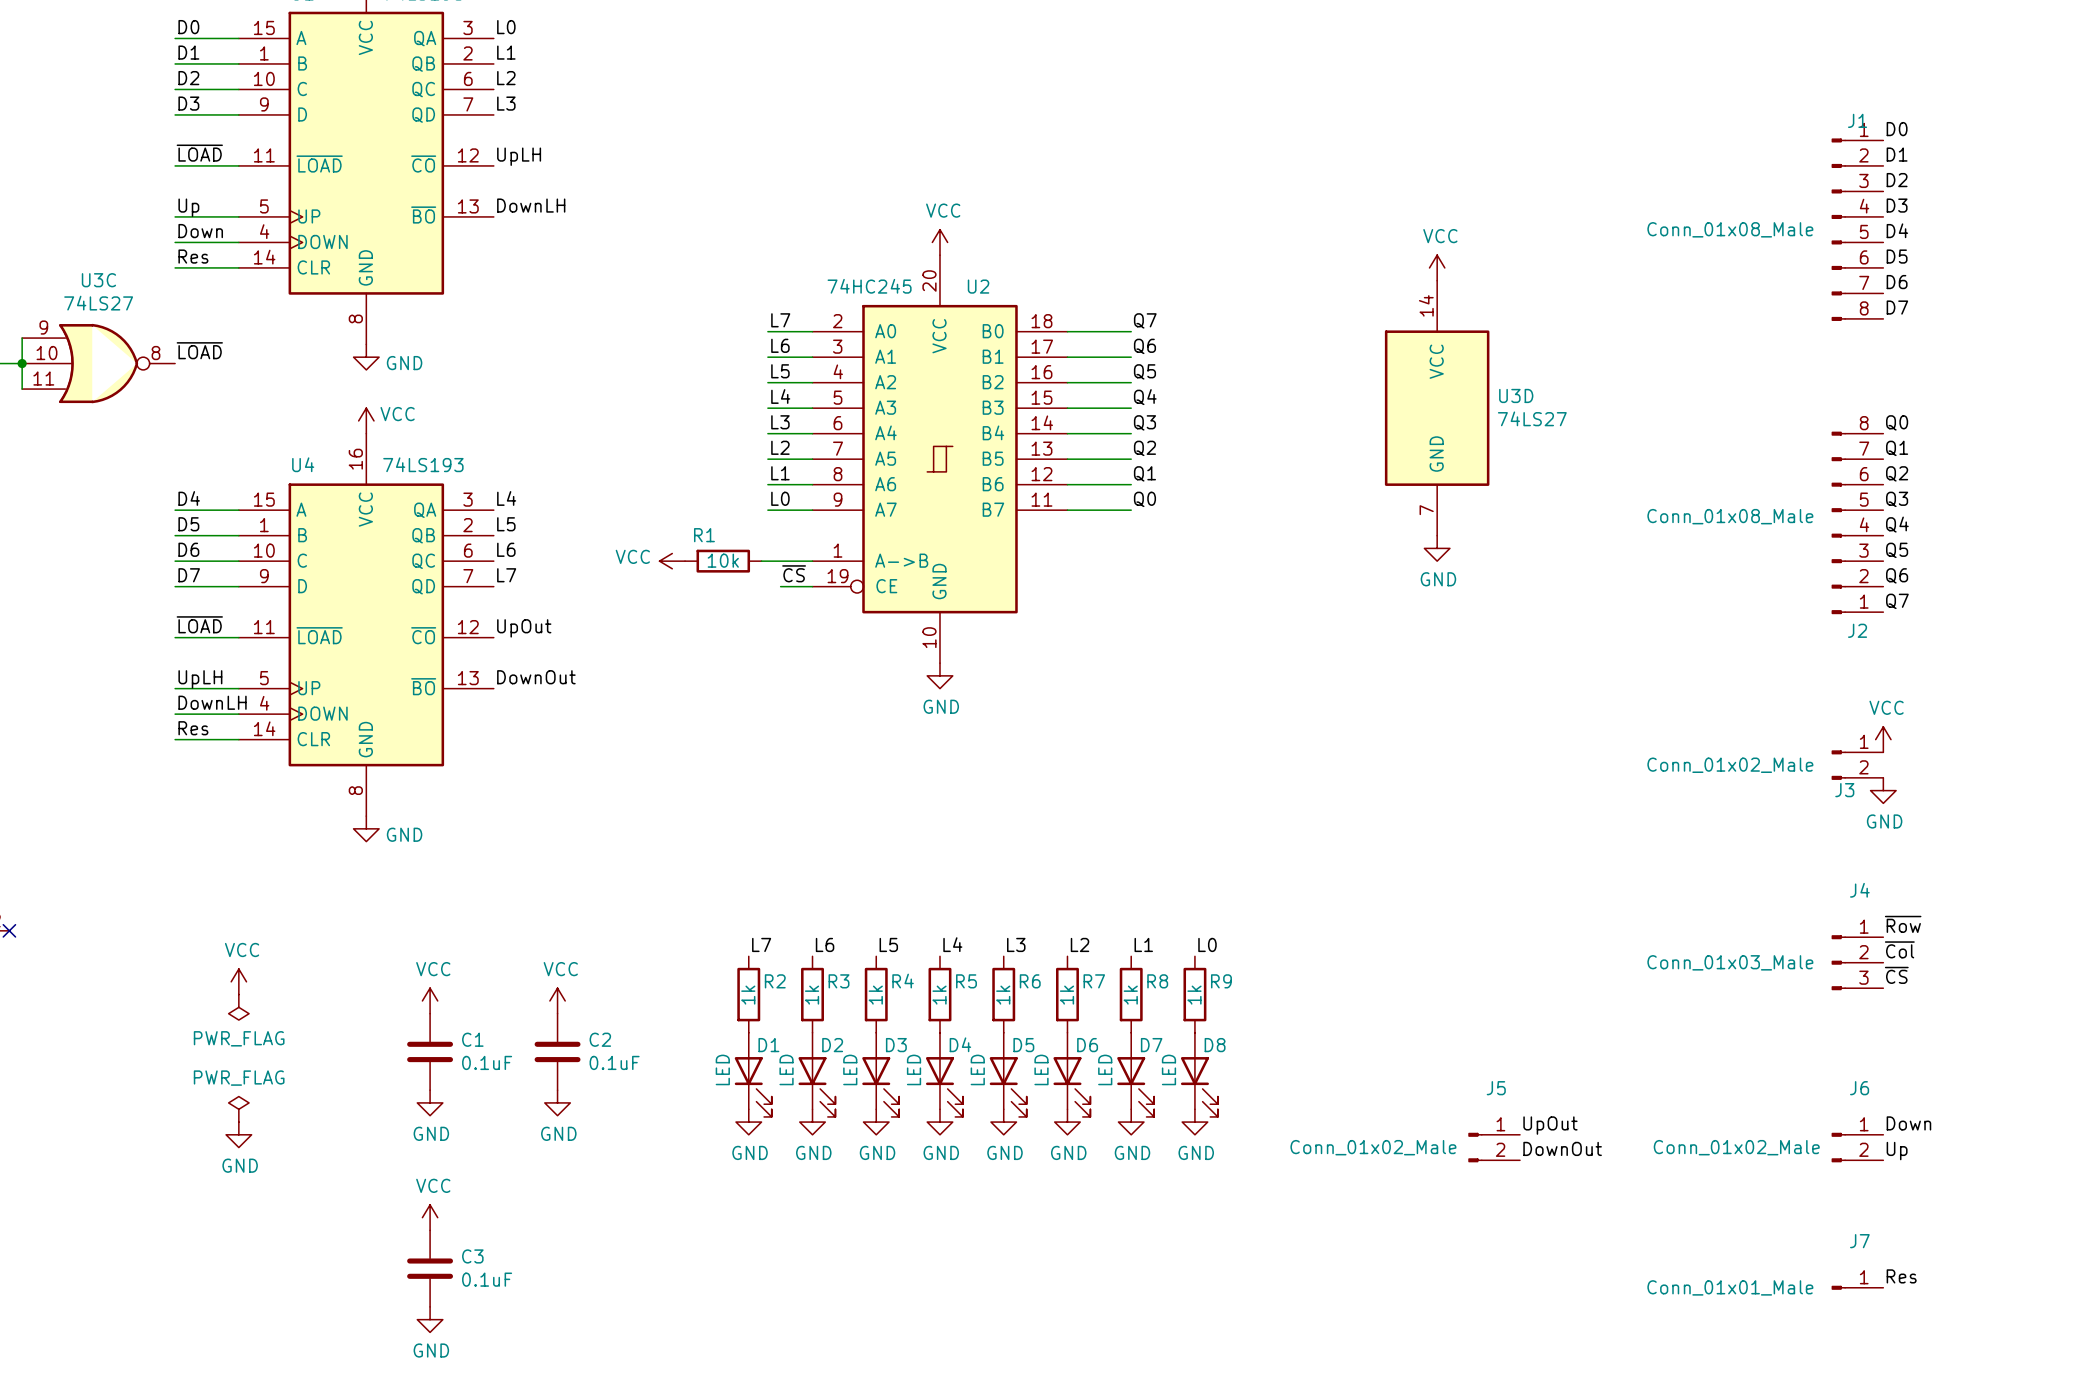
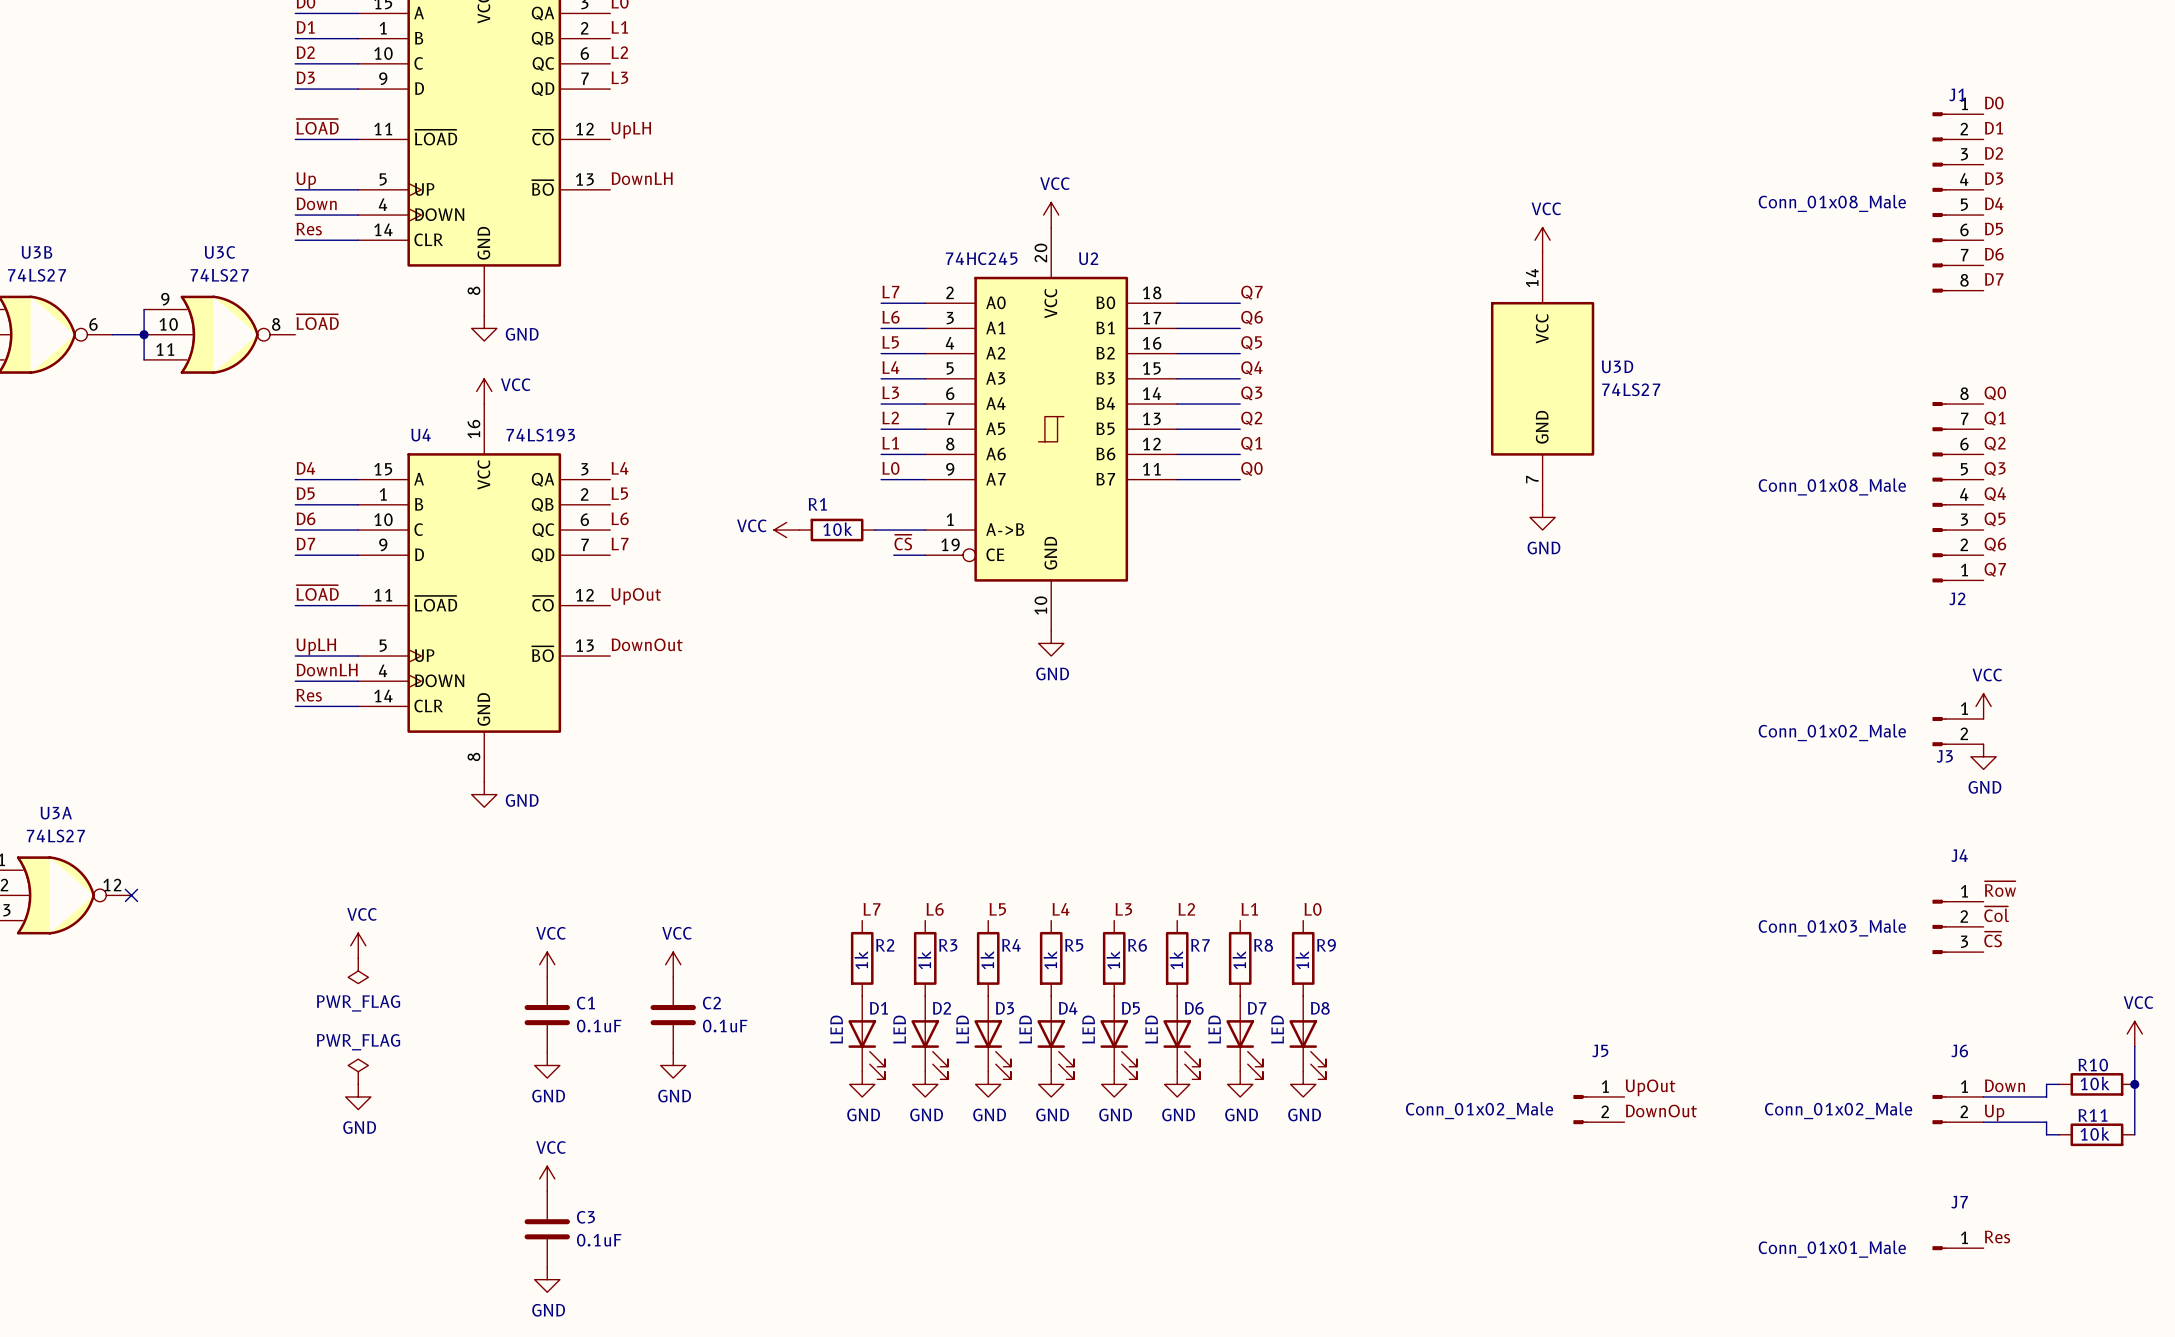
power symbol: none -> VCC (2134, 1033)
wire: none -> (2134, 1046) (2134, 1134)
wire: none -> (2059, 1084) (2046, 1084) (2046, 1096) (1983, 1096)
R10: none -> 10k (2096, 1084)
junction: none -> (2134, 1084)
wire: none -> (1983, 1122) (2046, 1122) (2046, 1134) (2059, 1134)
R11: none -> 10k (2096, 1134)

